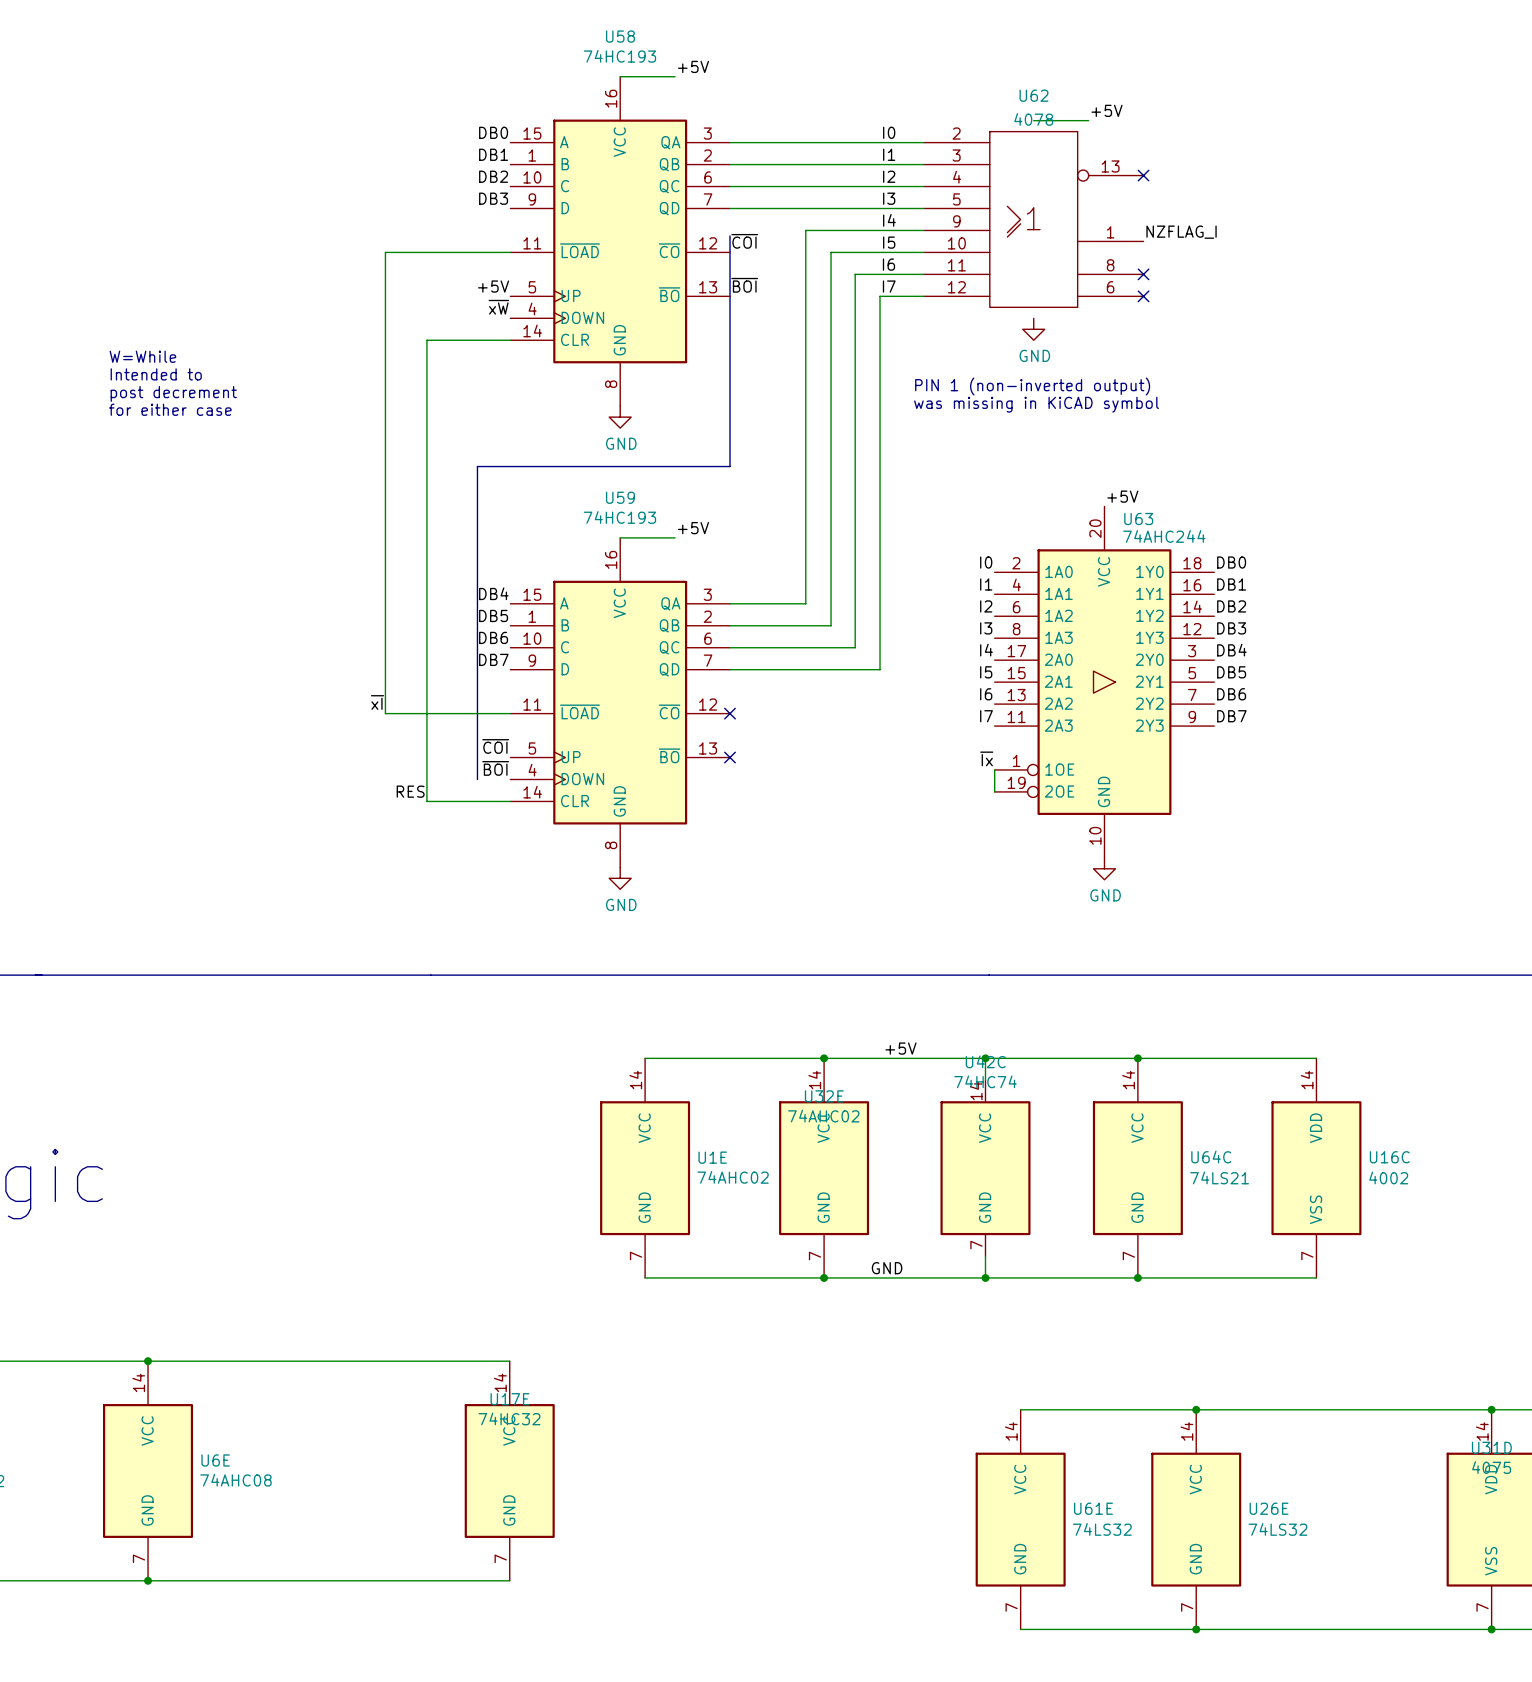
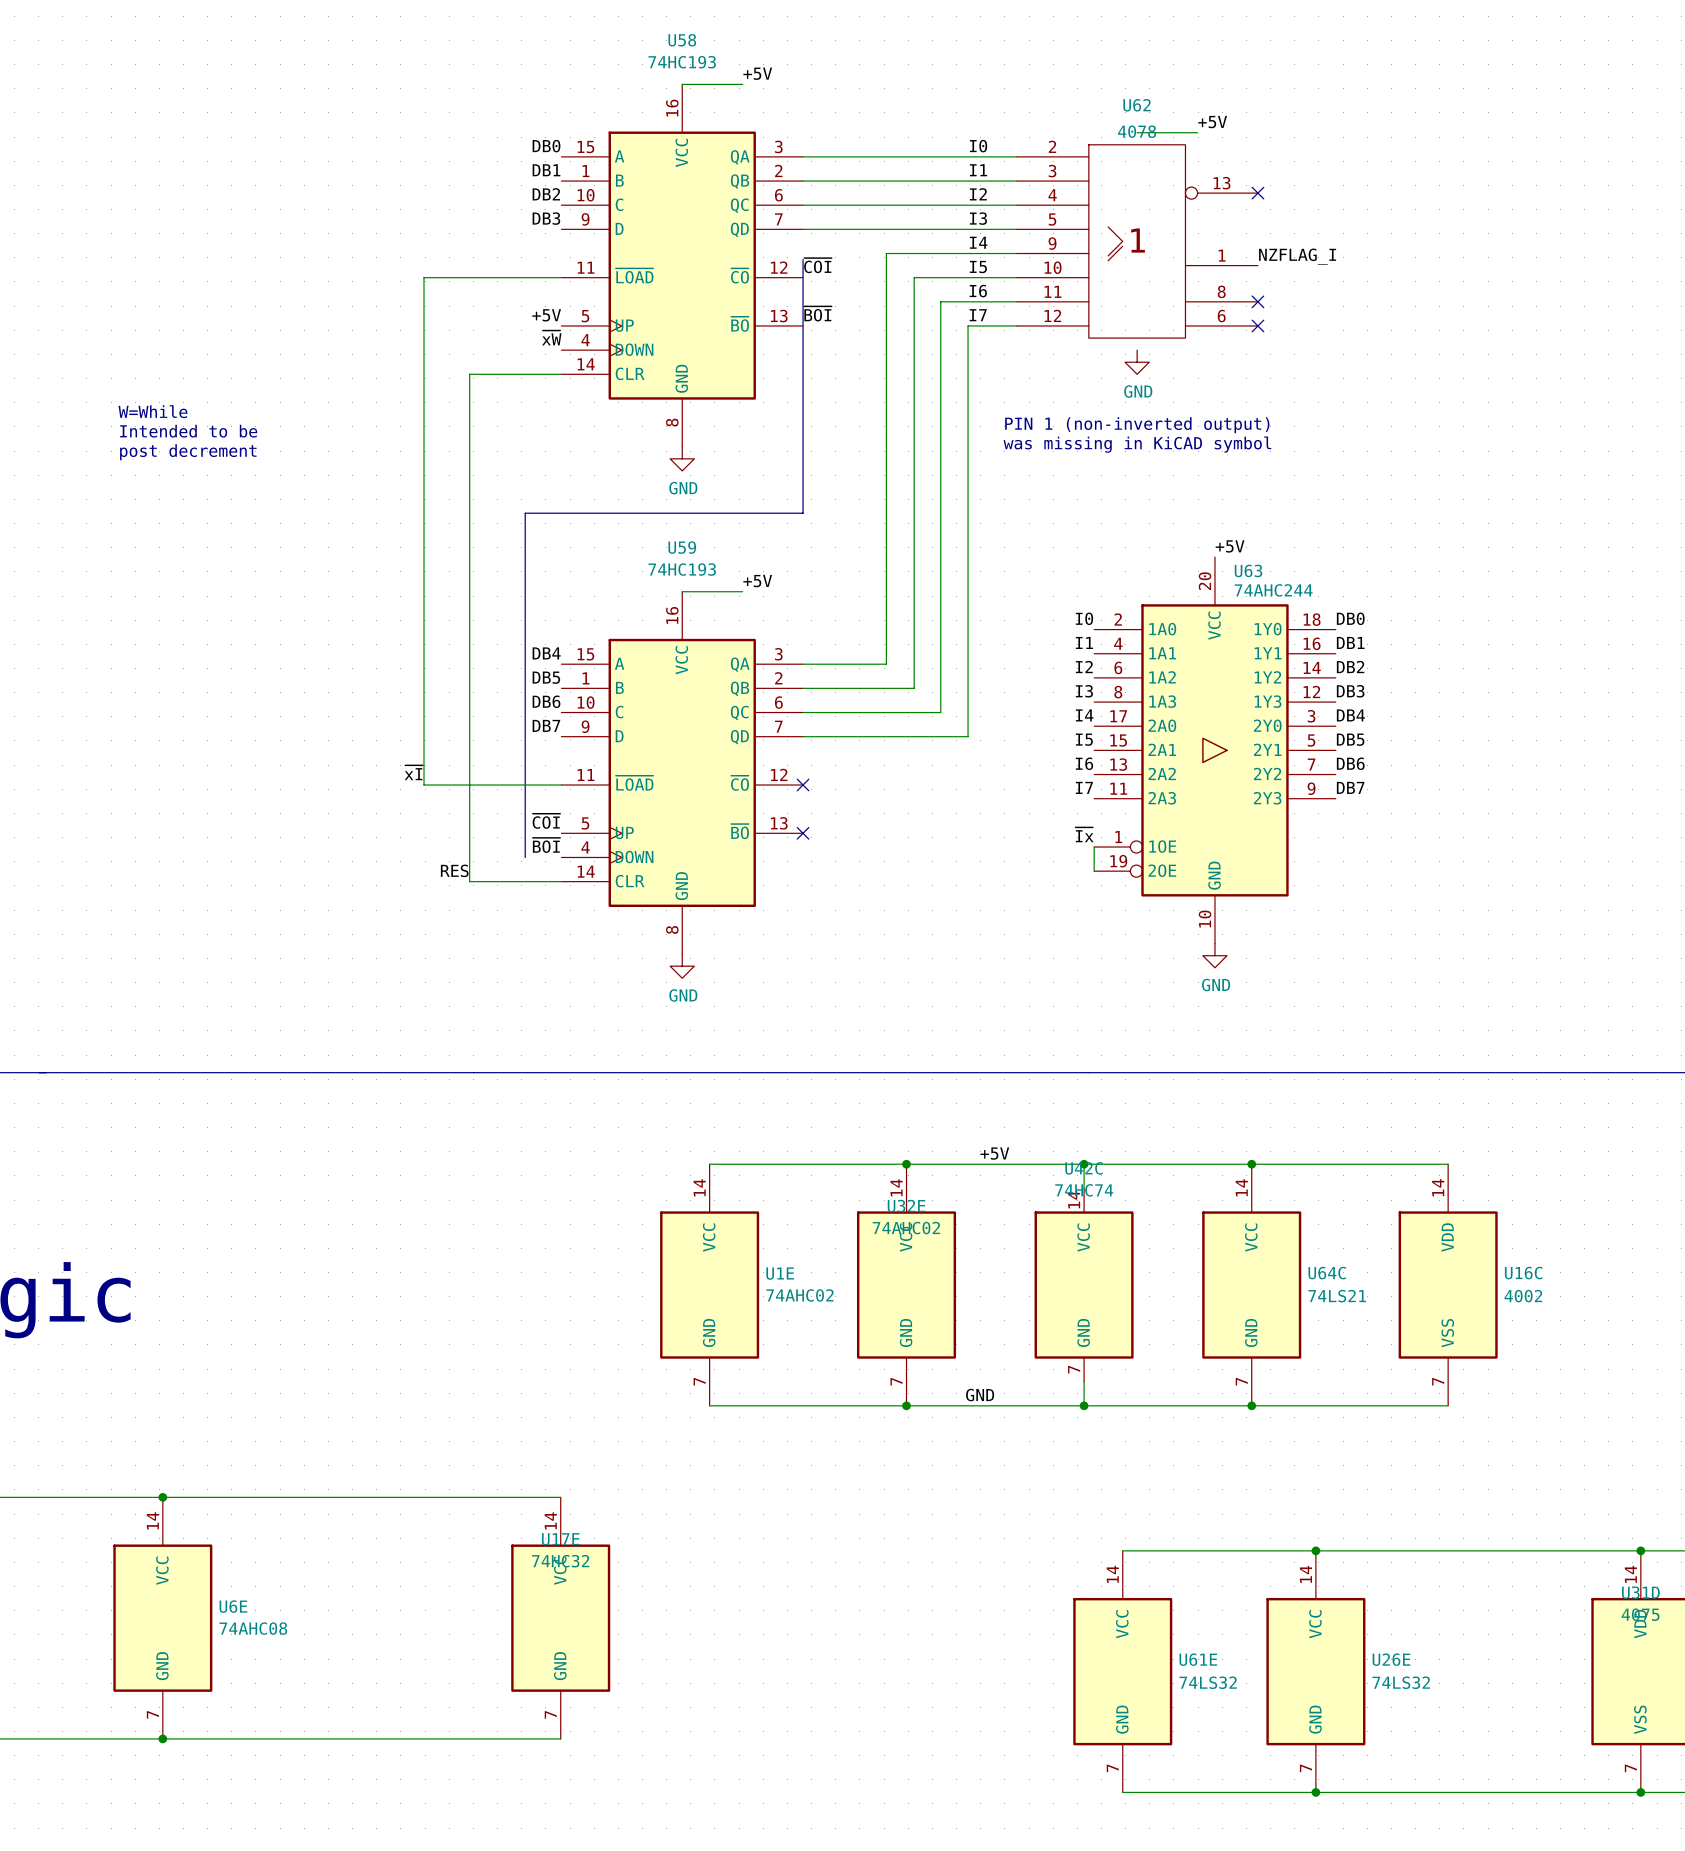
text: W=While (142, 356) -> none
text: Intended to (156, 374) -> W=While (152, 411)
text: post decrement (173, 393) -> Intended to be (188, 431)
text: for either case (170, 409) -> post decrement (188, 452)

